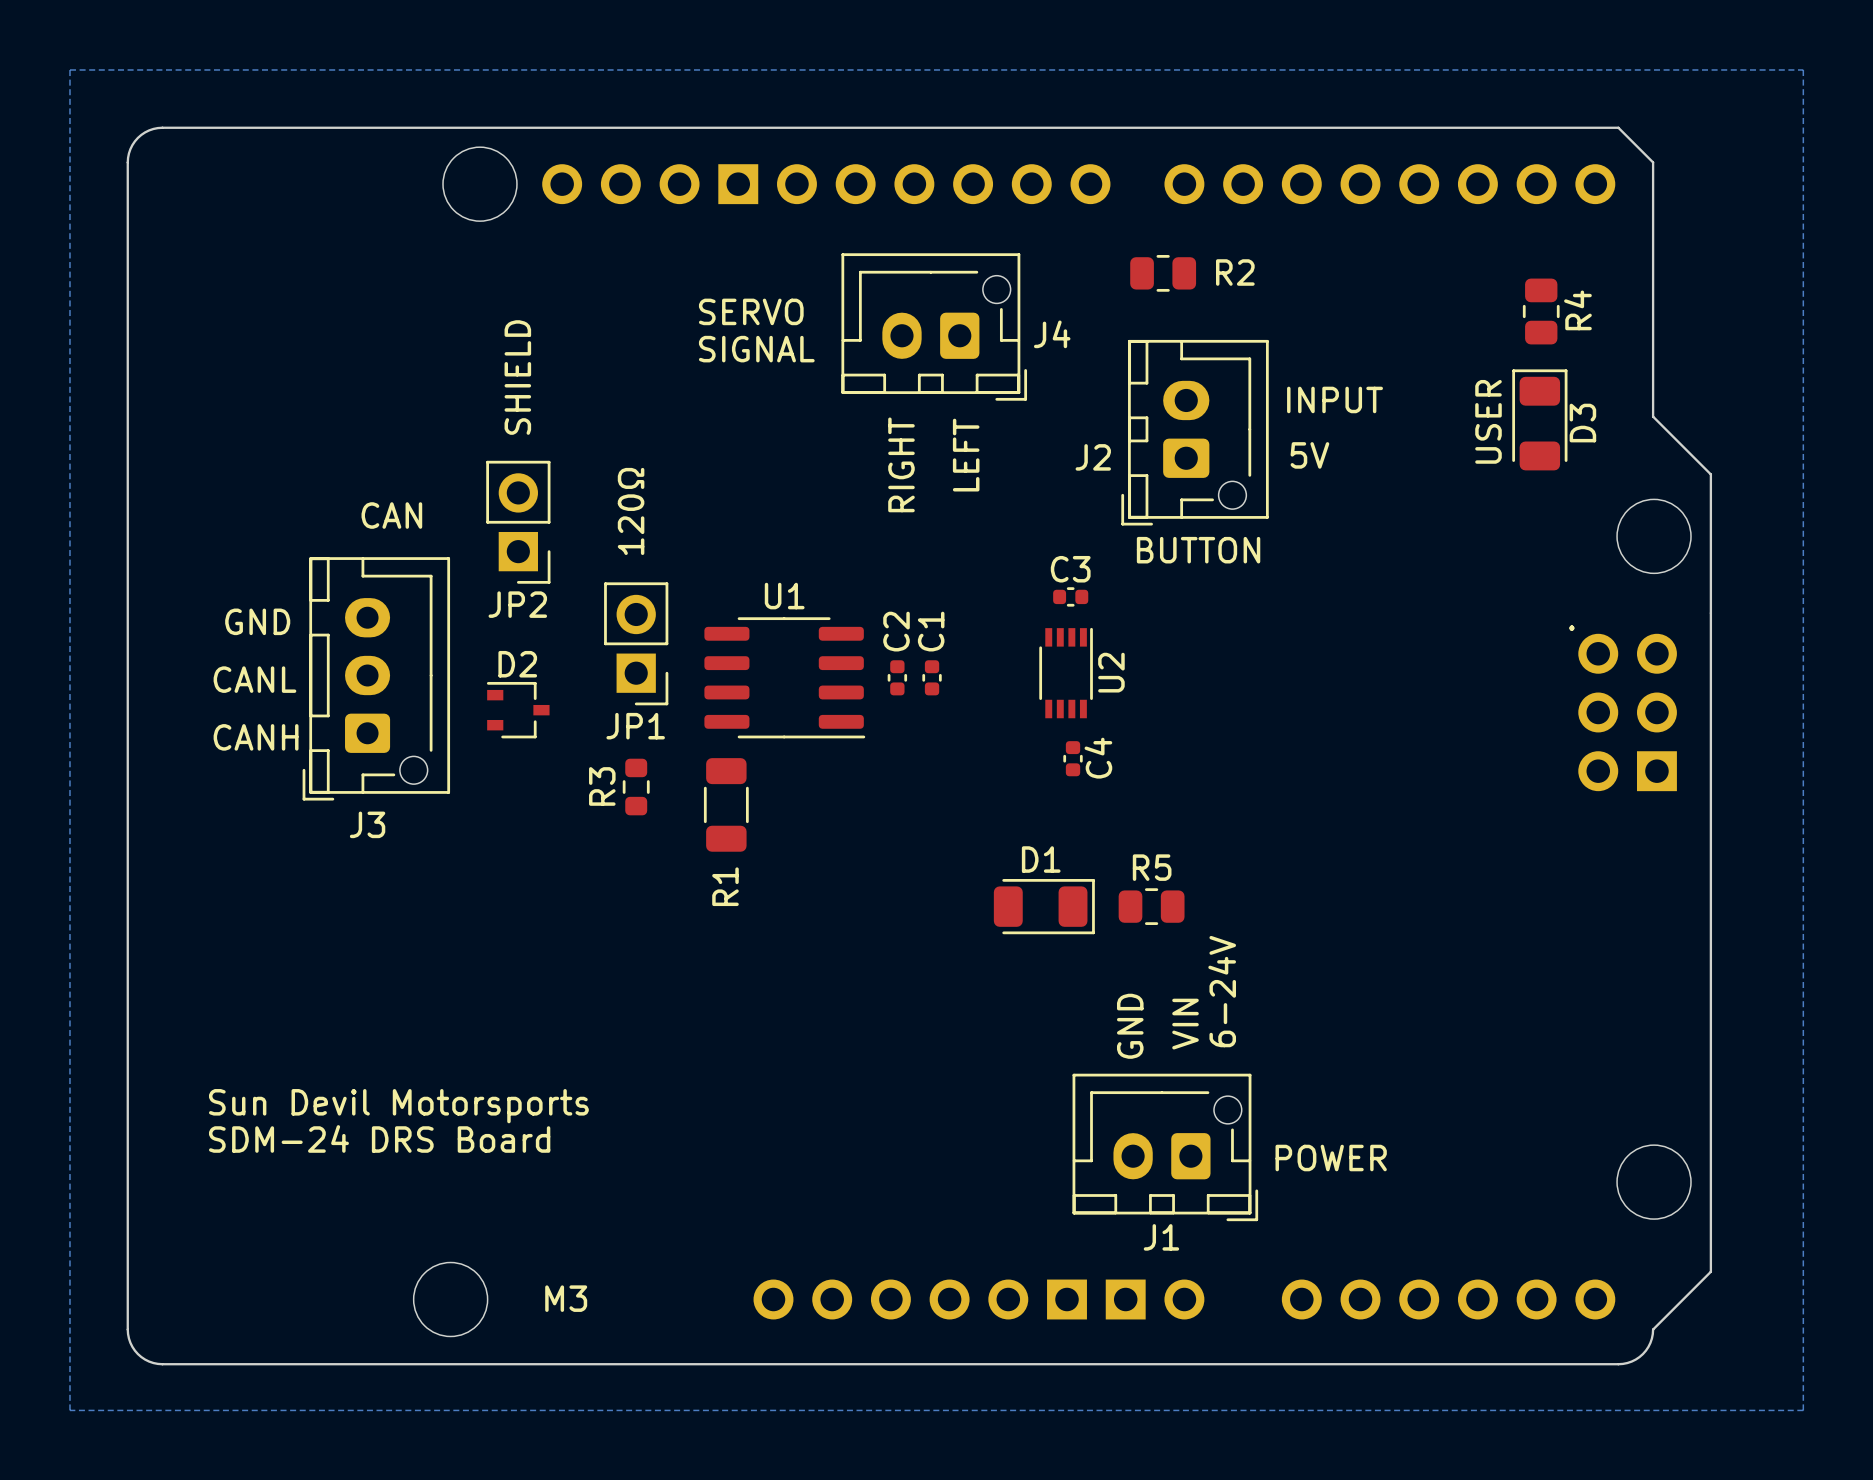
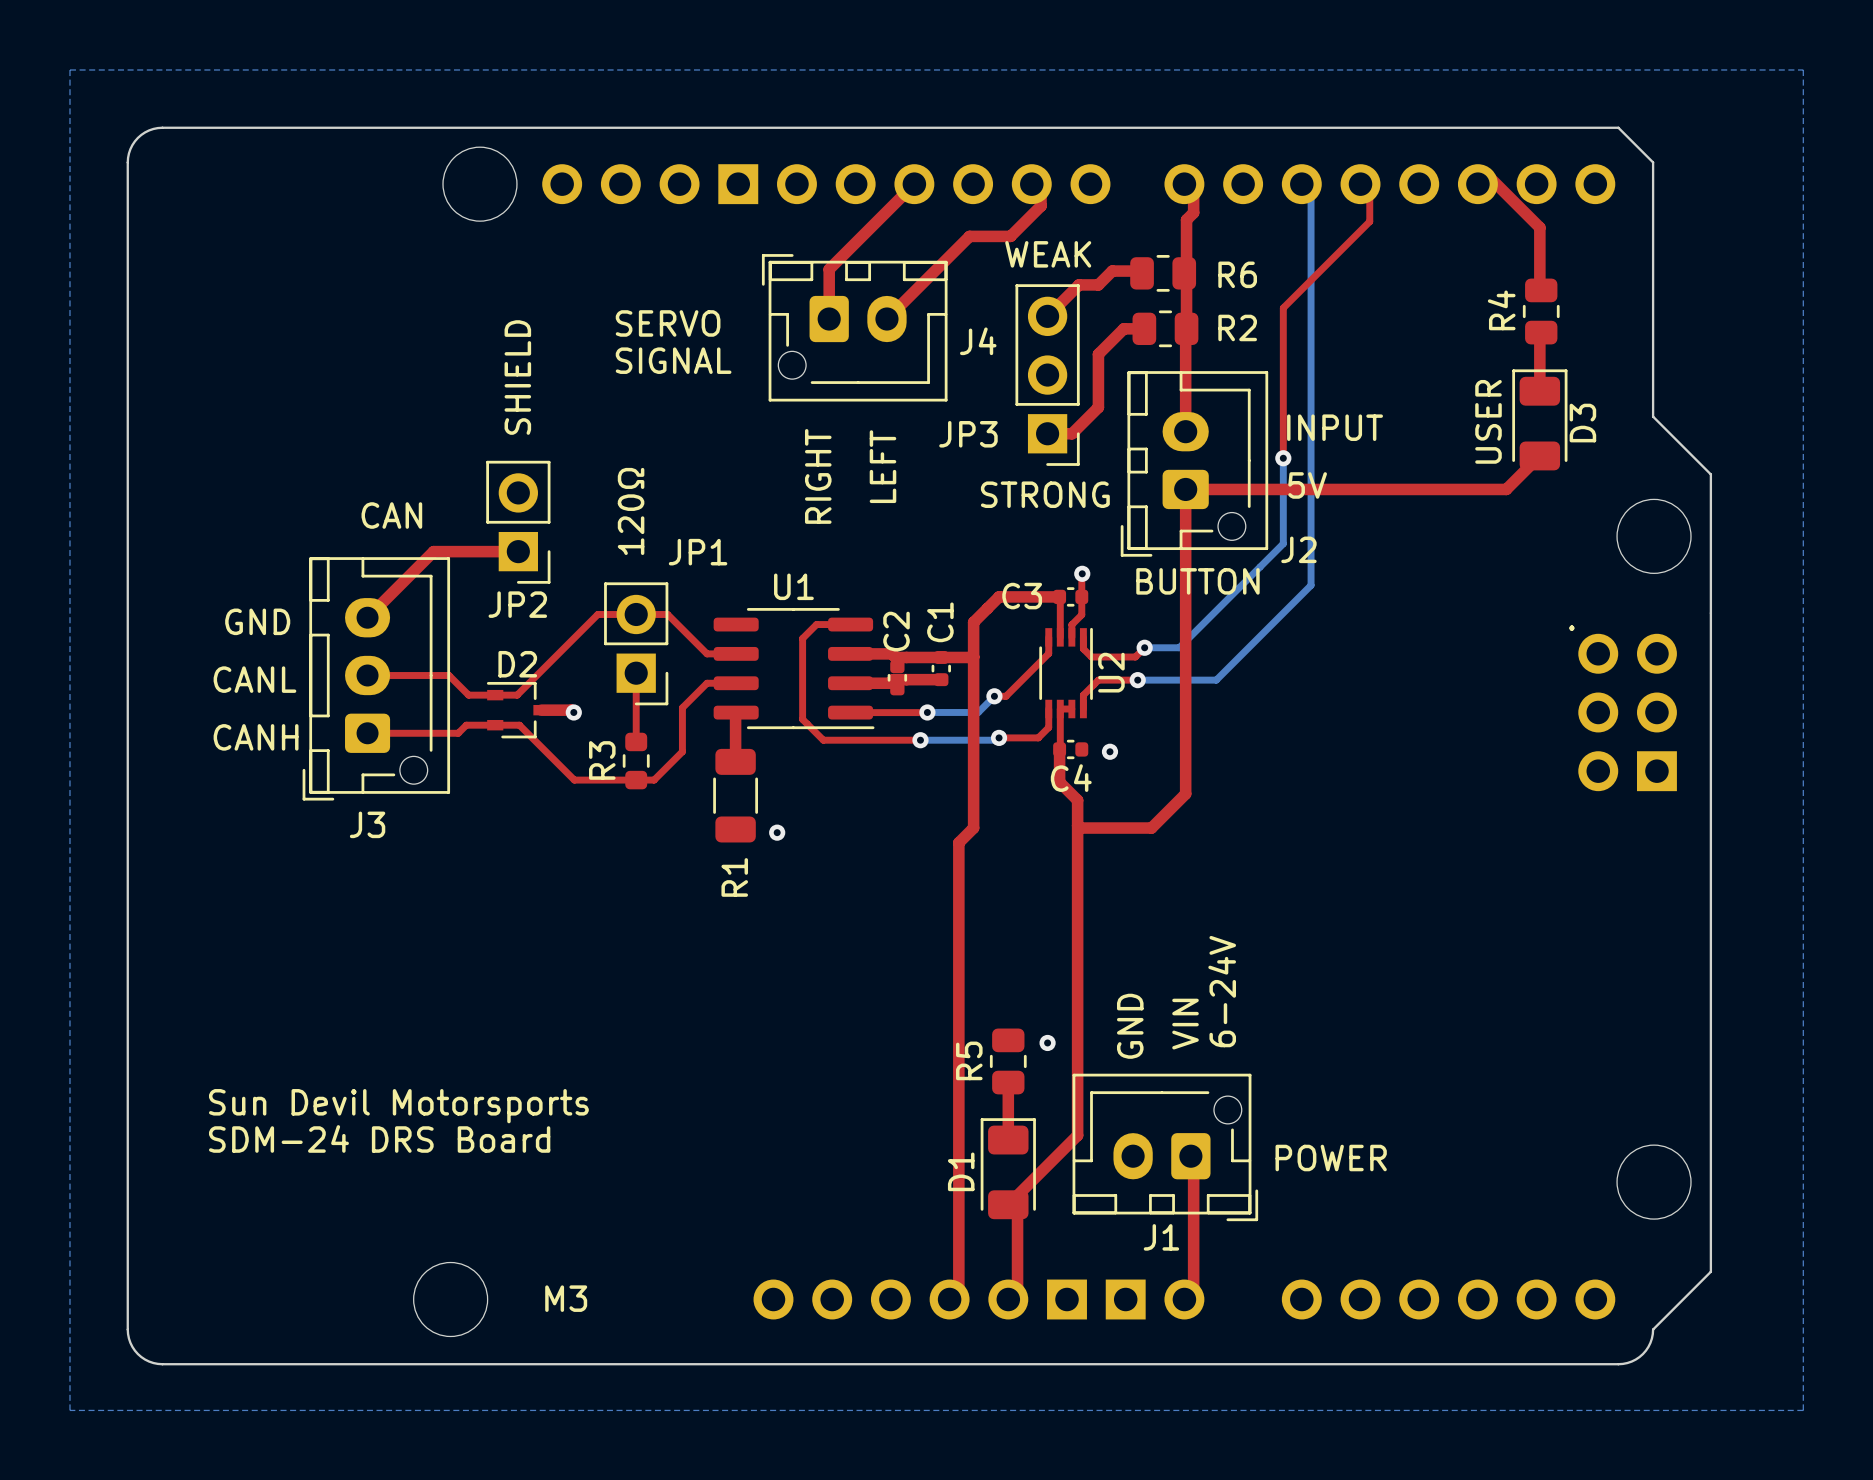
top track: none -> (923, 174) (829, 269) (829, 319)
top track: none -> (1041, 174) (1041, 205) (1010, 236) (969, 236) (886, 319)
top track: none -> (1193, 174) (1193, 212) (1186, 219) (1185, 431)
bottom track: none -> (1311, 174) (1311, 585) (1216, 680) (1137, 680)
top track: none -> (1369, 174) (1369, 221) (1283, 308) (1283, 458)
top track: none -> (1487, 174) (1539, 227) (1539, 291)
text: none -> WEAK (1048, 254)
top track: none -> (1144, 271) (1112, 271) (1098, 284) (1079, 284) (1047, 316)
R2 name: R2 (1235, 272) -> R6 (1237, 274)
R4 name position: R4 (1577, 310) -> R4 (1501, 310)
text position: SERVO (751, 311) -> SERVO (668, 323)
J4 rotation: 0° (934, 326) -> 180° (854, 327)
top track: none -> (1144, 328) (1123, 328) (1098, 354) (1098, 407) (1072, 433) (1047, 433)
R2: none -> (1165, 328)
top track: none -> (1539, 333) (1539, 391)
text position: SIGNAL (756, 349) -> SIGNAL (673, 360)
JP3: none -> (1047, 375)
text position: INPUT (1335, 399) -> INPUT (1335, 427)
J2 position: (1195, 432) -> (1194, 463)
text position: LEFT (966, 455) -> LEFT (882, 466)
text position: 5V (1309, 455) -> 5V (1307, 485)
top track: none -> (1539, 455) (1506, 489) (1185, 489) (1185, 793) (1151, 828) (1079, 828) (1077, 825)
J2 name position: J2 (1093, 457) -> J2 (1298, 549)
bottom track: none -> (1283, 458) (1283, 543) (1179, 647) (1144, 647)
via: none -> (1283, 458)
text position: RIGHT (901, 464) -> RIGHT (818, 476)
text: none -> STRONG (1045, 494)
text position: BUTTON (1198, 550) -> BUTTON (1197, 581)
top track: none -> (518, 551) (433, 551) (367, 617)
C3 name position: C3 (1070, 569) -> C3 (1022, 596)
top track: none -> (1082, 573) (1081, 614) (1071, 624) (1071, 637)
via: none -> (1082, 573)
top track: none -> (850, 624) (816, 624) (802, 638) (802, 719) (823, 740) (920, 740)
top track: none -> (1048, 637) (1048, 653) (1005, 696) (994, 696)
top track: none -> (1060, 637) (1059, 596) (999, 596) (973, 622) (973, 828) (958, 842) (958, 1290)
top track: none -> (1083, 637) (1083, 648) (1091, 657) (1135, 657) (1144, 647)
via: none -> (1144, 647)
top track: none -> (736, 653) (707, 653) (667, 614) (597, 614) (517, 695) (468, 695) (449, 675) (367, 675)
top track: none -> (850, 653) (891, 653) (895, 657) (973, 657)
top track: none -> (636, 673) (636, 741)
U1 position: (784, 677) -> (794, 668)
C1 position: (932, 677) -> (941, 668)
top track: none -> (941, 679) (893, 679) (889, 683) (850, 683)
top track: none -> (1137, 680) (1098, 680) (1083, 695) (1083, 709)
via: none -> (1137, 680)
top track: none -> (736, 683) (707, 683) (682, 707) (682, 751) (654, 780) (574, 780) (519, 725) (466, 725) (458, 733) (367, 733)
bottom track: none -> (994, 696) (978, 712) (927, 712)
via: none -> (994, 696)
top track: none -> (1048, 709) (1048, 727) (1038, 737) (999, 737)
top track: none -> (1071, 709) (1060, 709) (1059, 781) (1077, 800) (1077, 1135) (1008, 1204) (1017, 1213) (1017, 1290)
top track: none -> (541, 710) (571, 710) (573, 712)
via: none -> (573, 712)
top track: none -> (736, 712) (735, 761)
top track: none -> (850, 712) (927, 712)
via: none -> (927, 712)
JP1 name position: JP1 (635, 726) -> JP1 (698, 552)
bottom track: none -> (999, 737) (996, 740) (920, 740)
via: none -> (999, 737)
via: none -> (920, 740)
via: none -> (1109, 751)
C4 rotation: 0° (1073, 758) -> 90° clockwise (1070, 749)
R3 position: (636, 787) -> (636, 761)
R1 position: (726, 804) -> (735, 795)
via: none -> (777, 832)
R5 name position: R5 (1152, 867) -> R5 (969, 1060)
D1 rotation: 0° (1044, 906) -> 90° counterclockwise (1008, 1168)
D1 position: (1044, 906) -> (1008, 1168)
R5 rotation: 0° (1151, 906) -> 90° clockwise (1008, 1061)
R5 position: (1151, 906) -> (1008, 1061)
via: none -> (1047, 1042)
top track: none -> (1008, 1082) (1008, 1140)
top track: none -> (1190, 1156) (1193, 1158) (1193, 1290)

